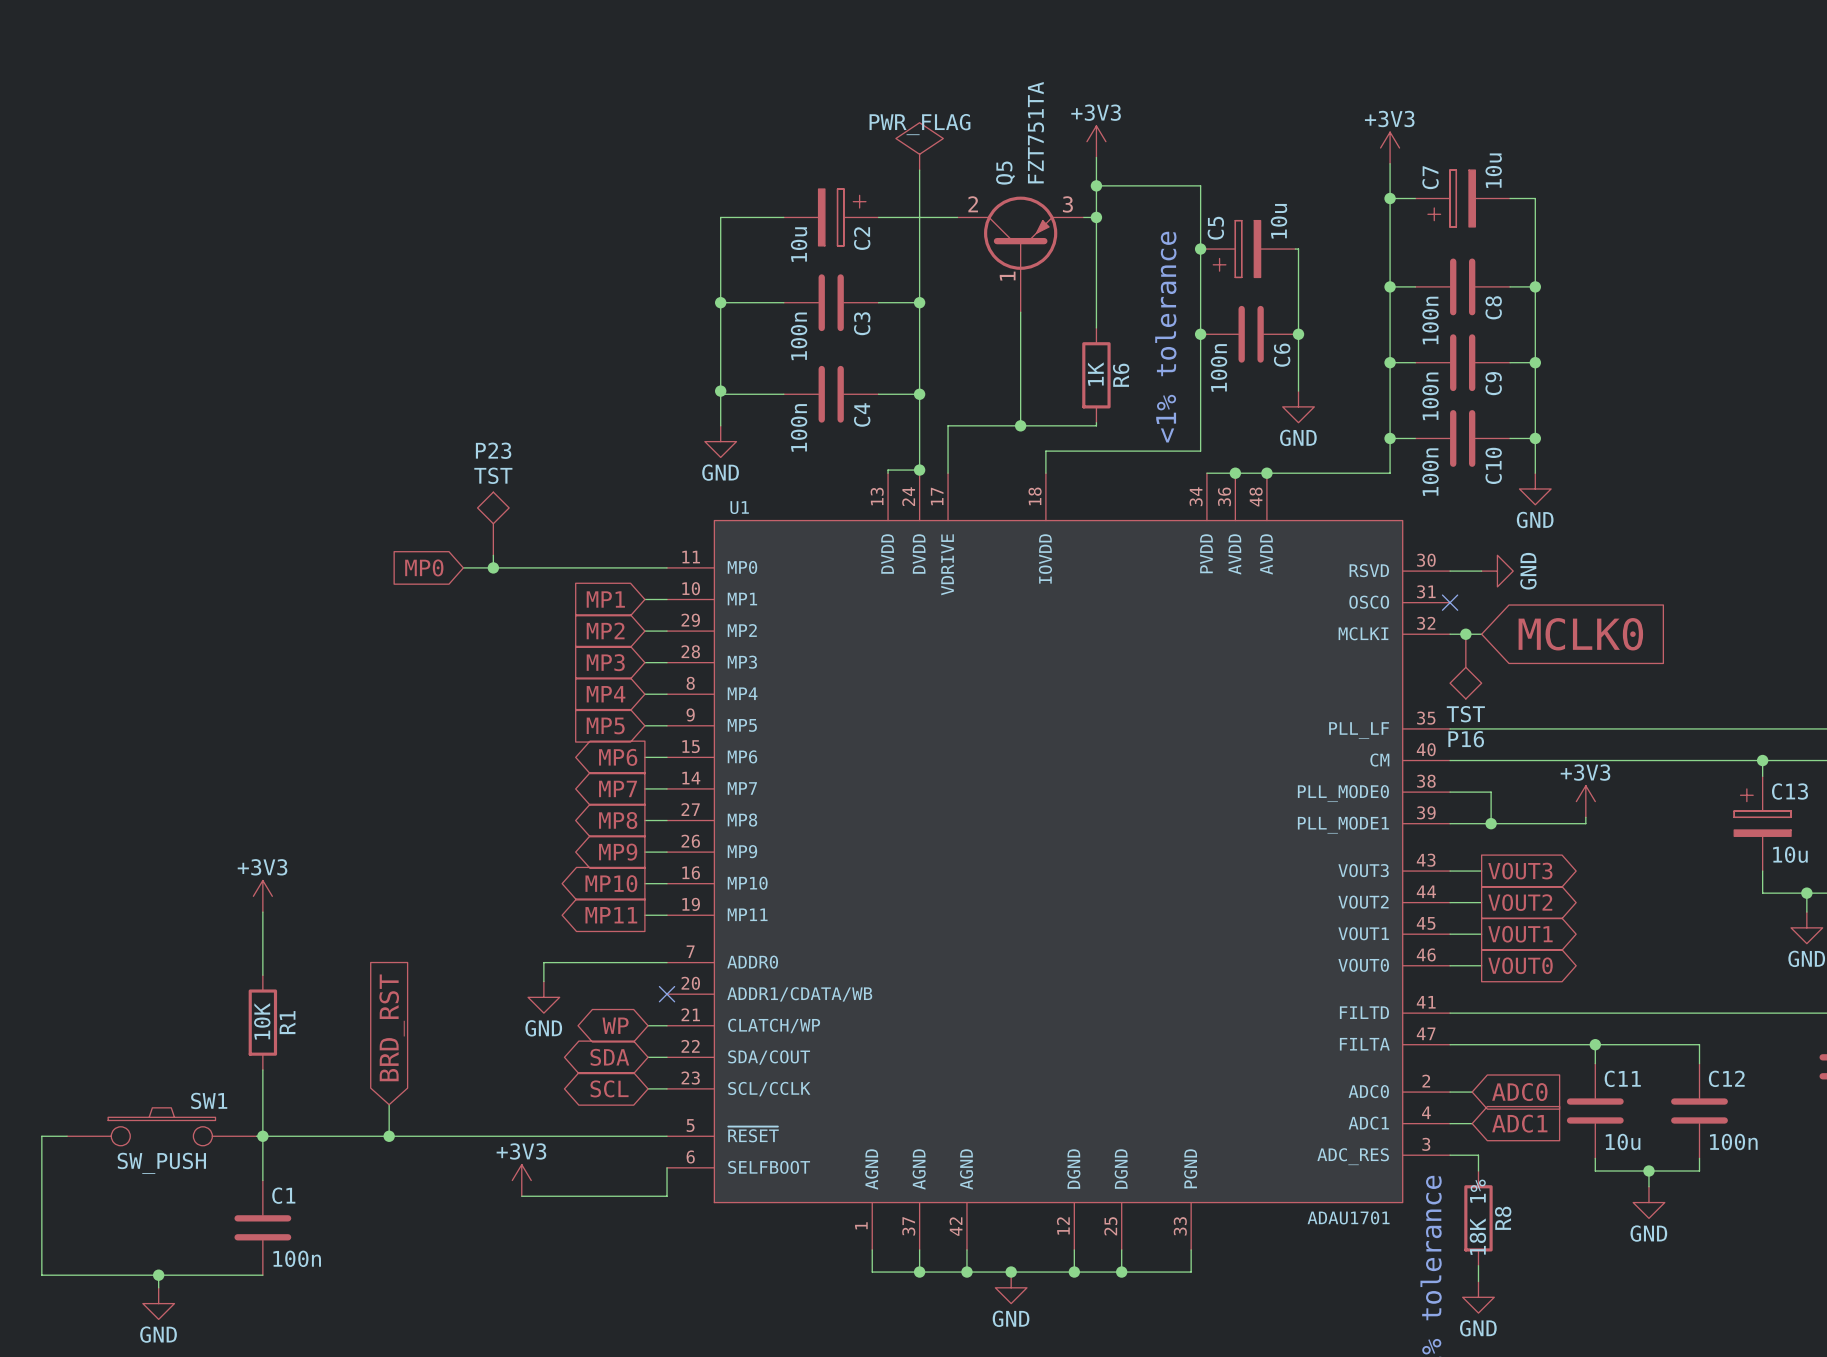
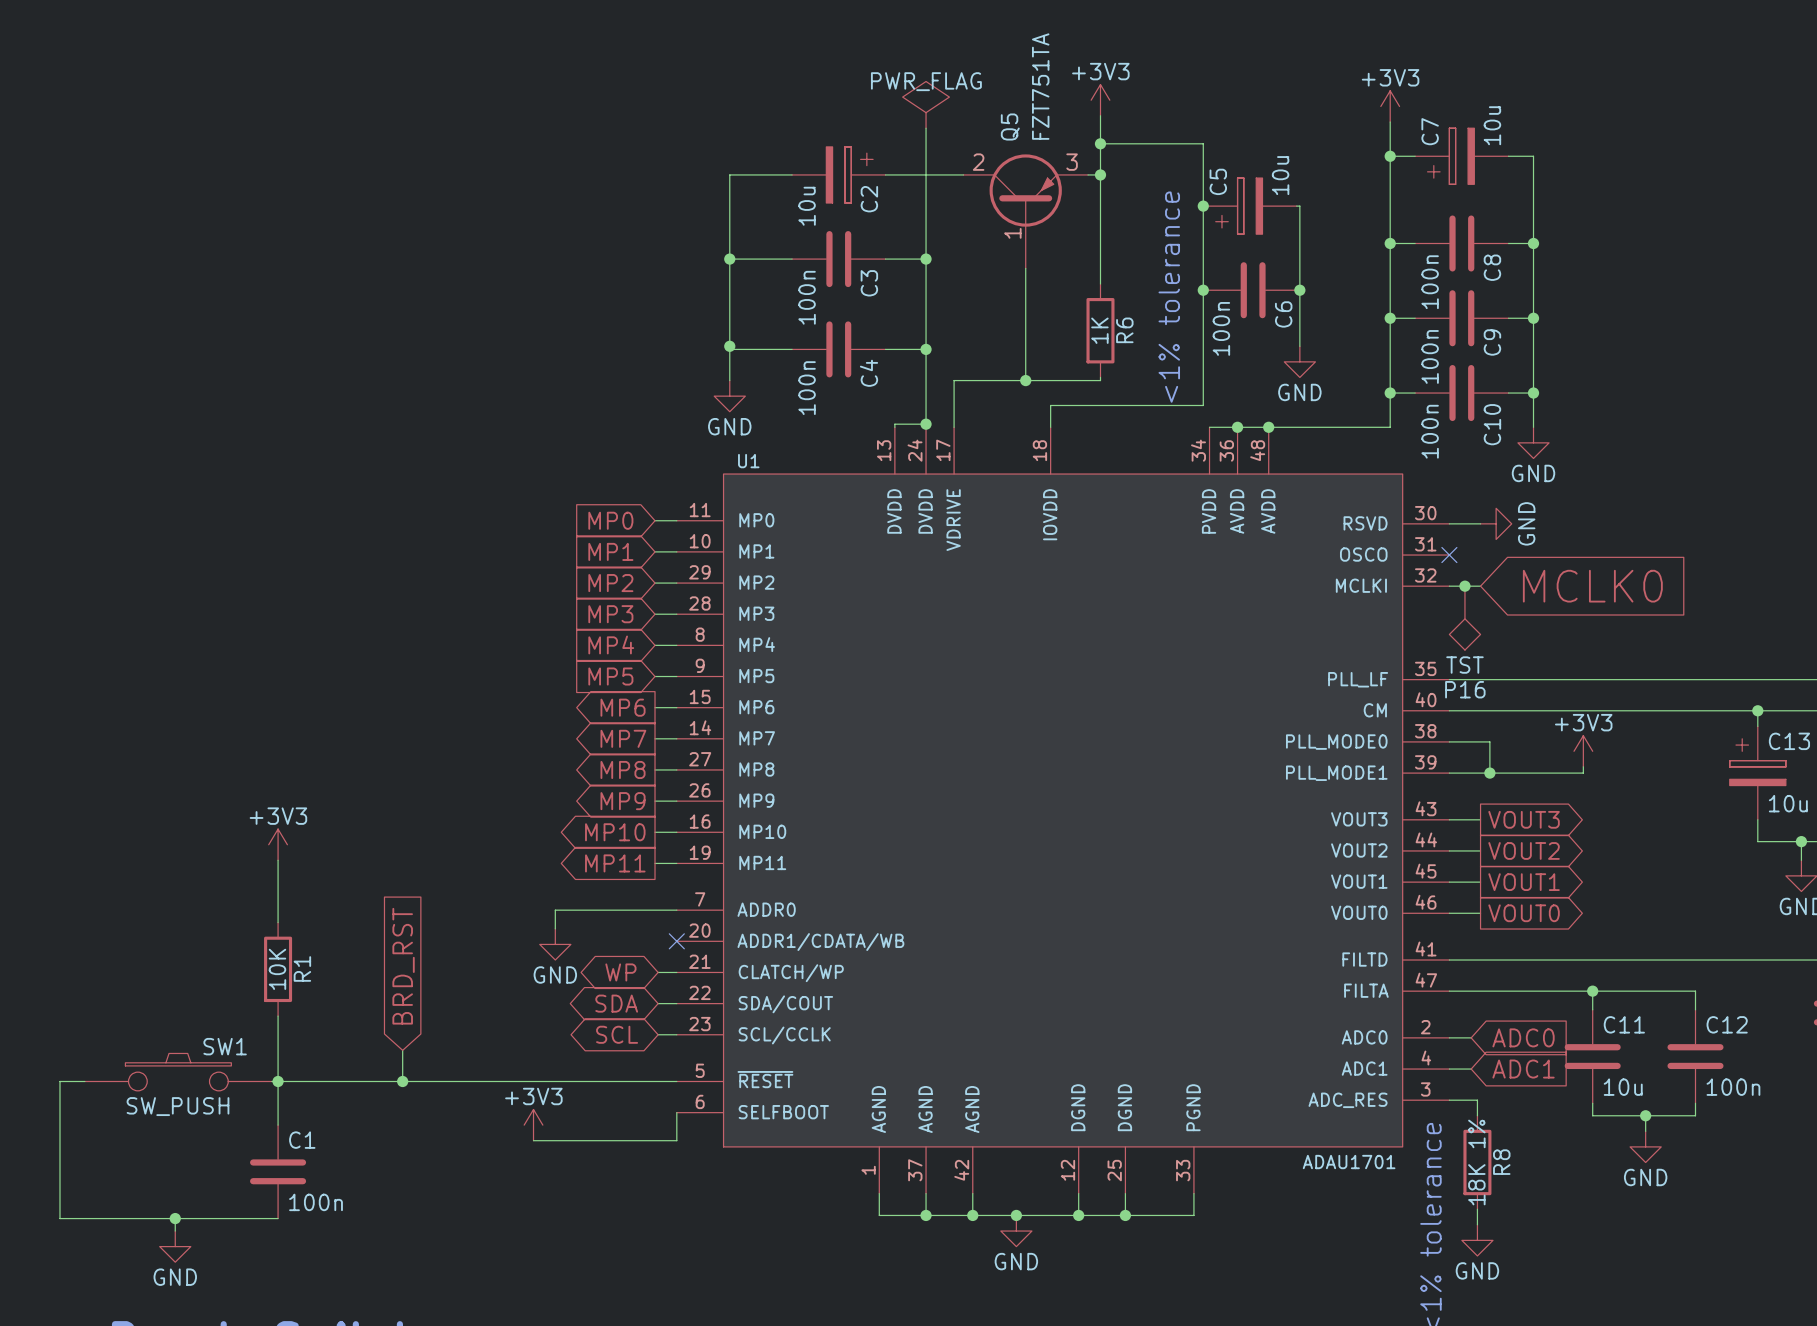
P23: TST (493, 523) -> none
wire: (493, 555) (493, 567) -> none
global label position: MP0 (424, 567) -> MP0 (610, 520)
wire: (463, 567) (644, 567) -> none
junction: (493, 567) -> none

